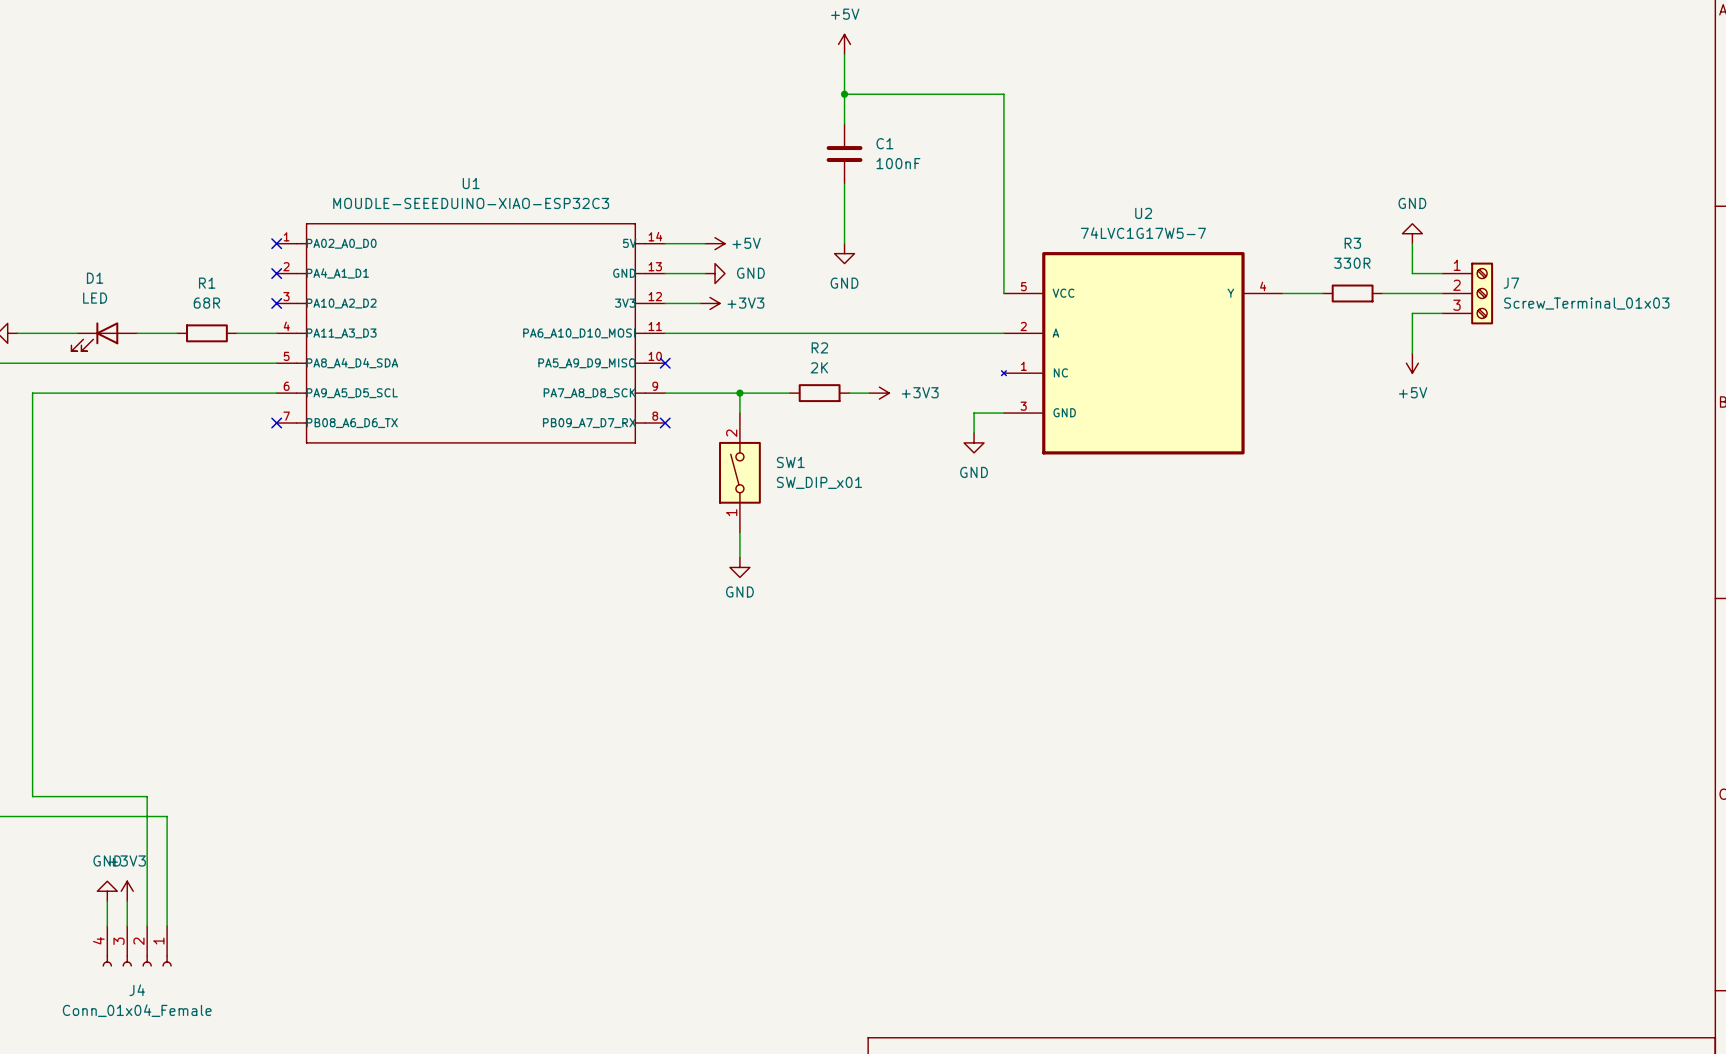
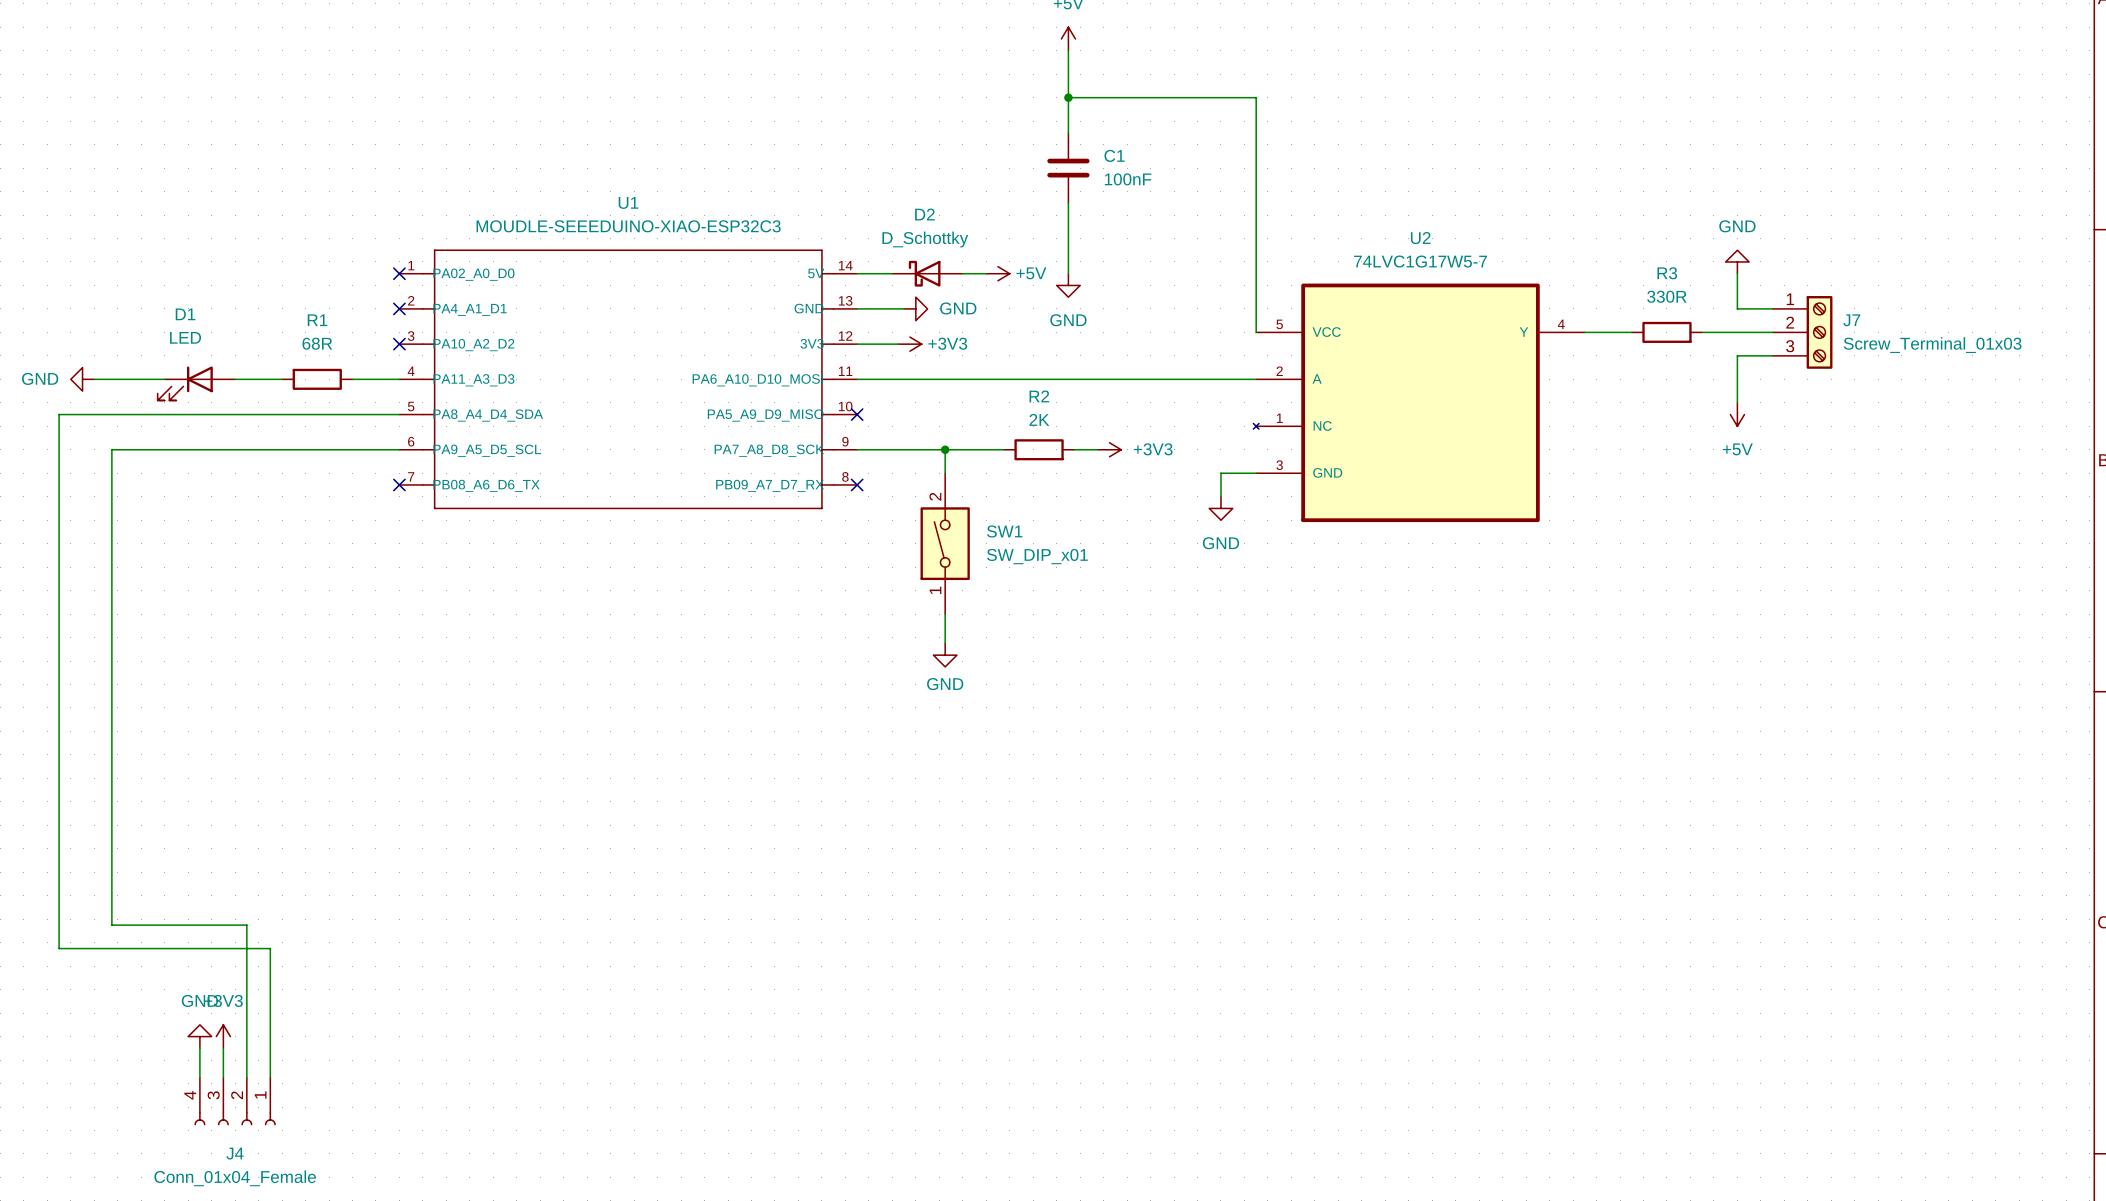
power symbol position: +5V (715, 243) -> +5V (997, 273)
D2: none -> D_Schottky (927, 273)
wire: none -> (962, 273) (986, 273)

